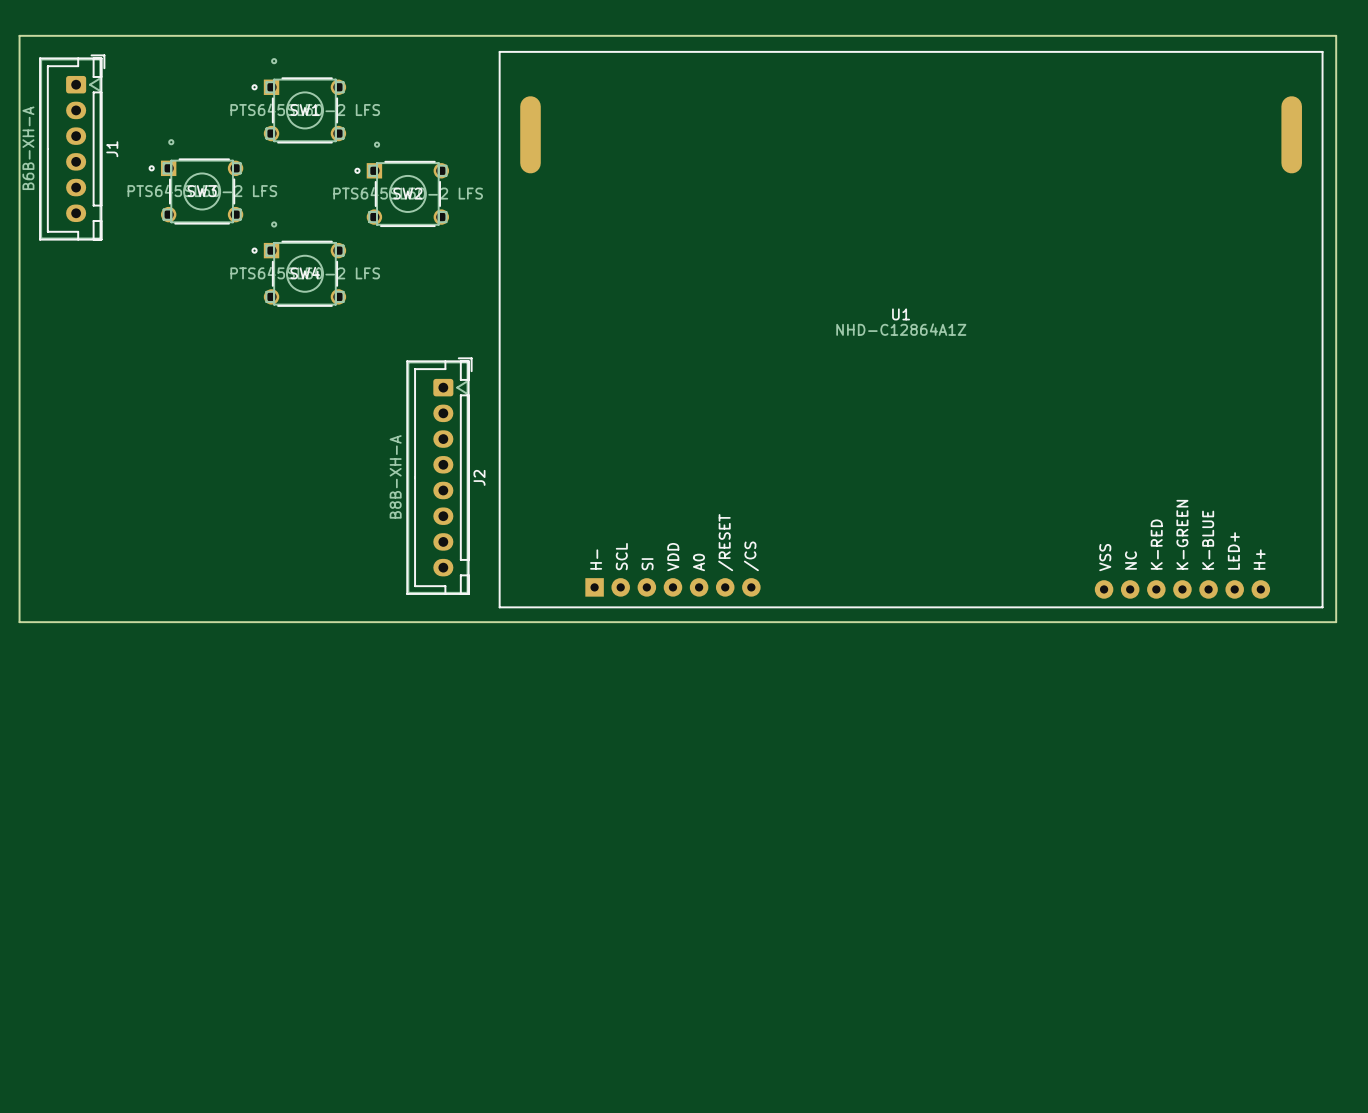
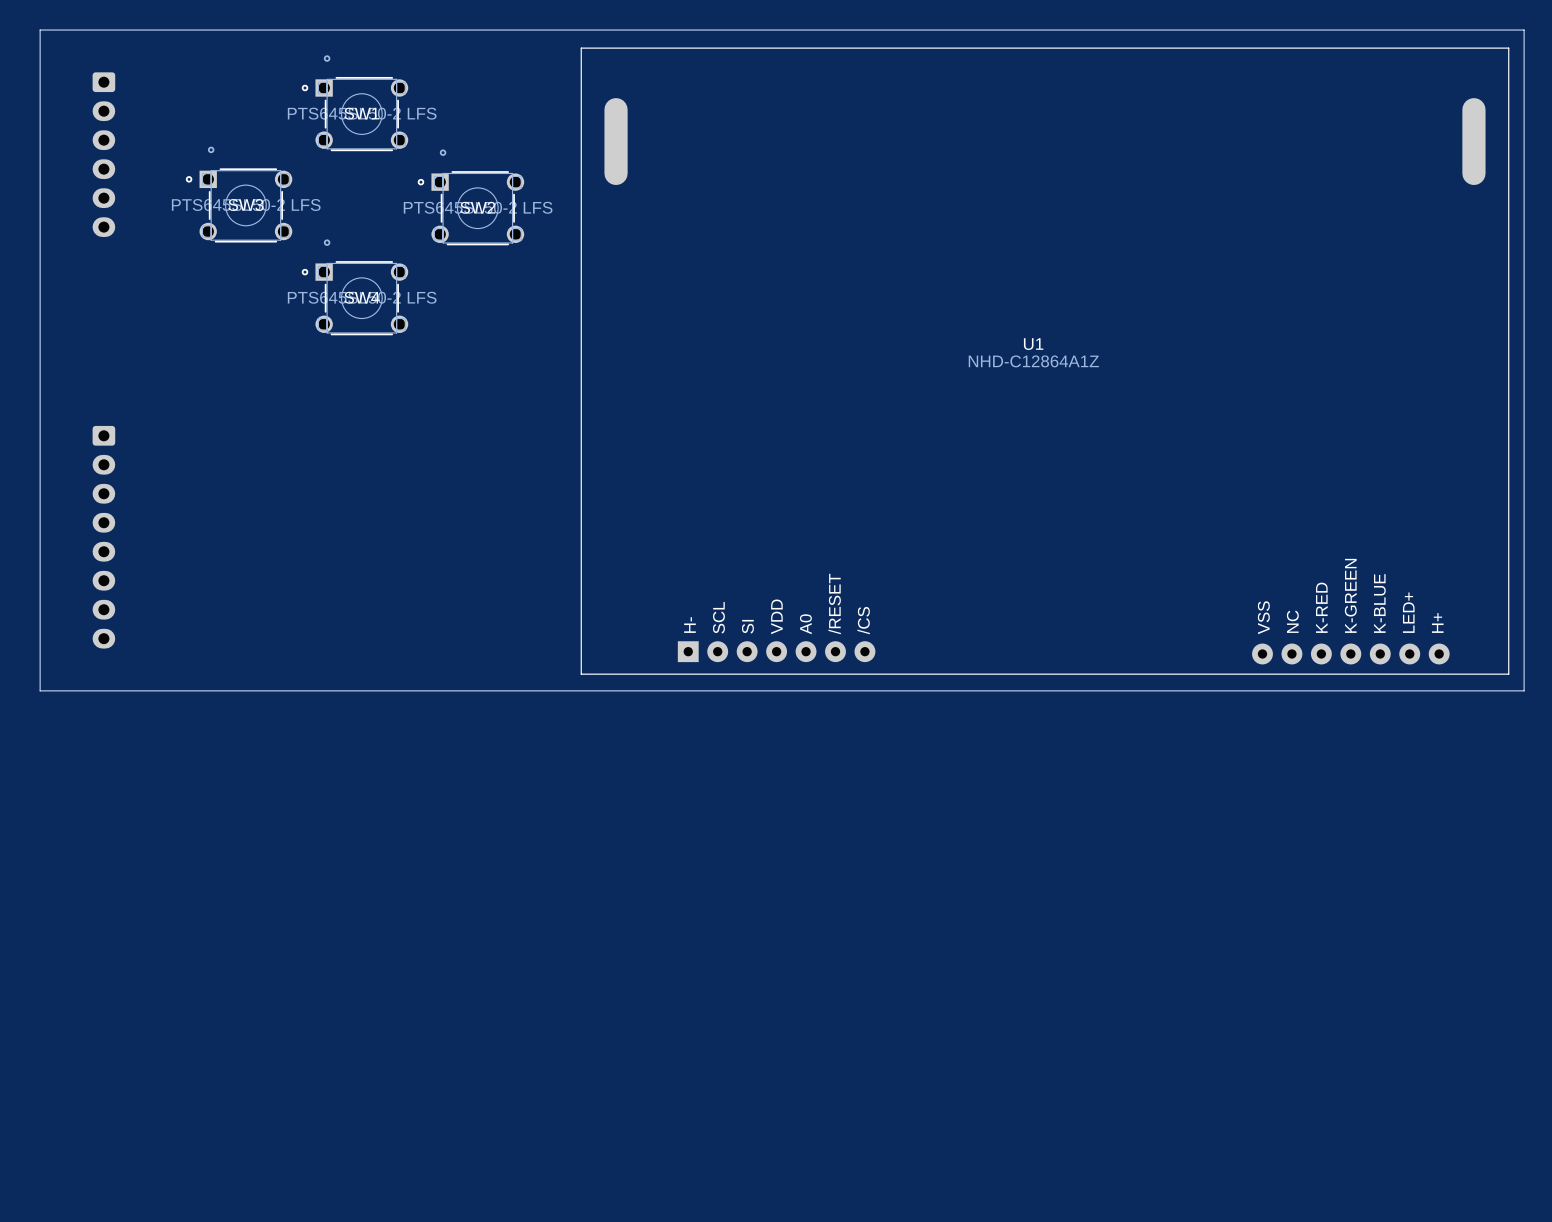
J1 side: top (72, 147) -> bottom (103, 154)
J2: B8B-XH-A (439, 476) -> none
part: none -> (103, 537)

